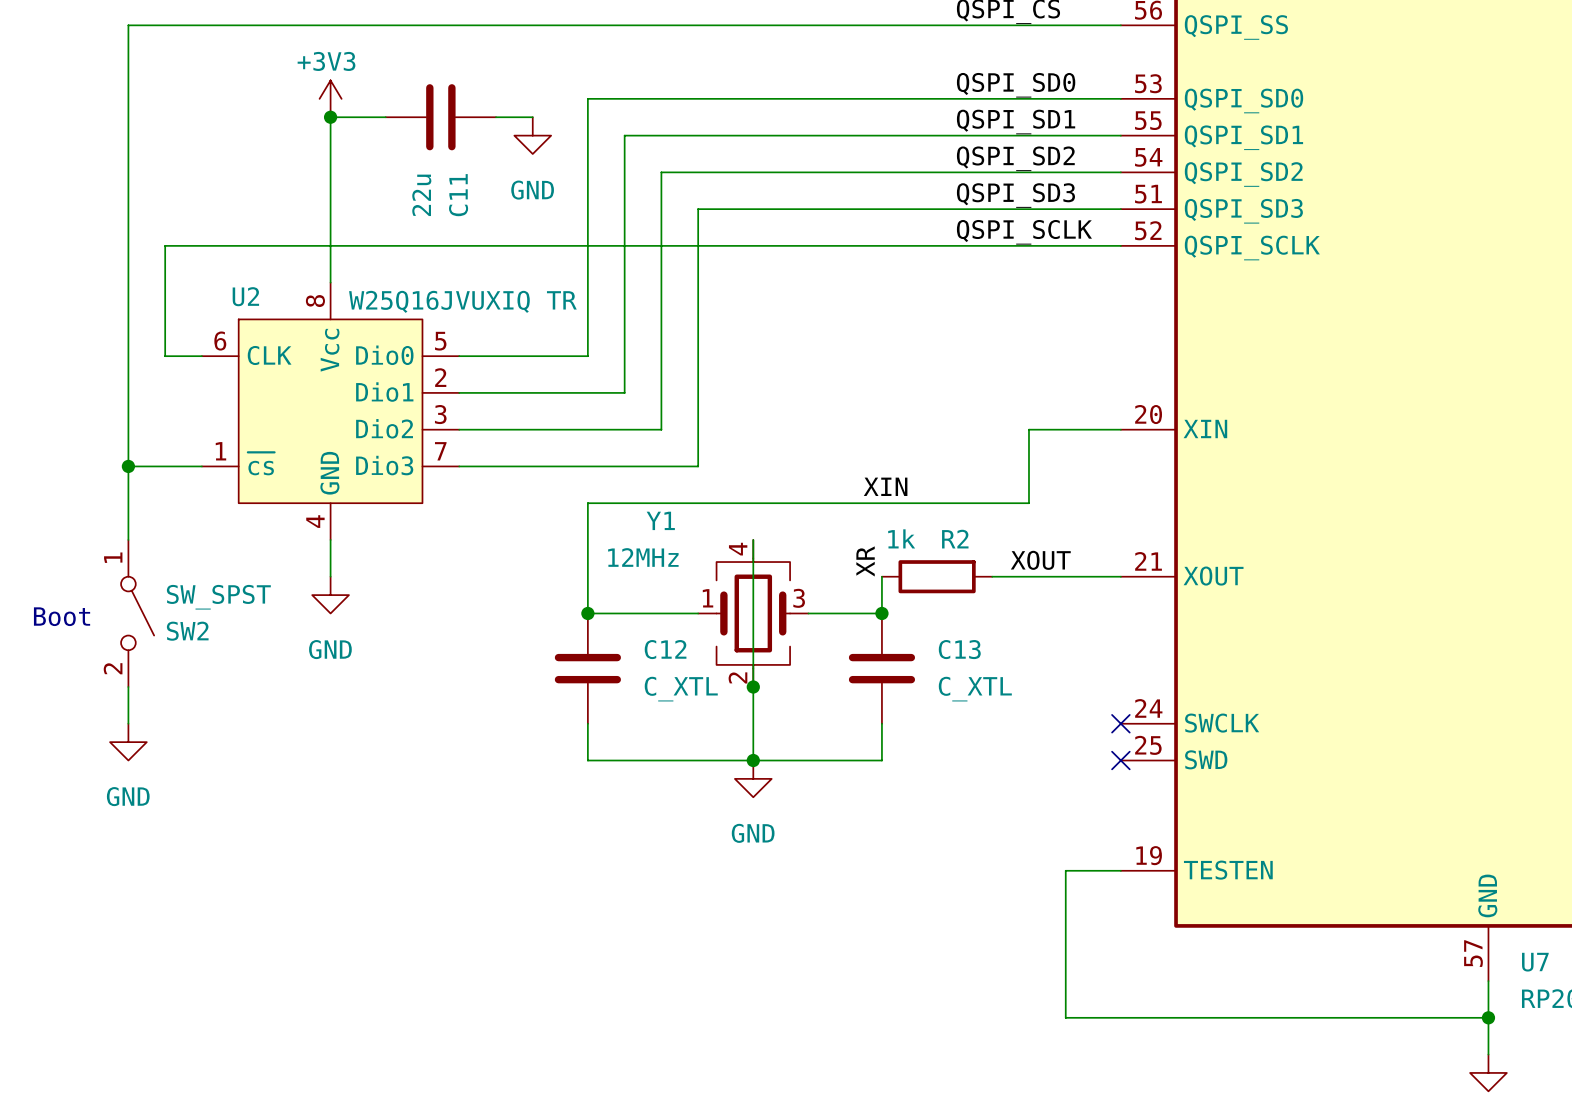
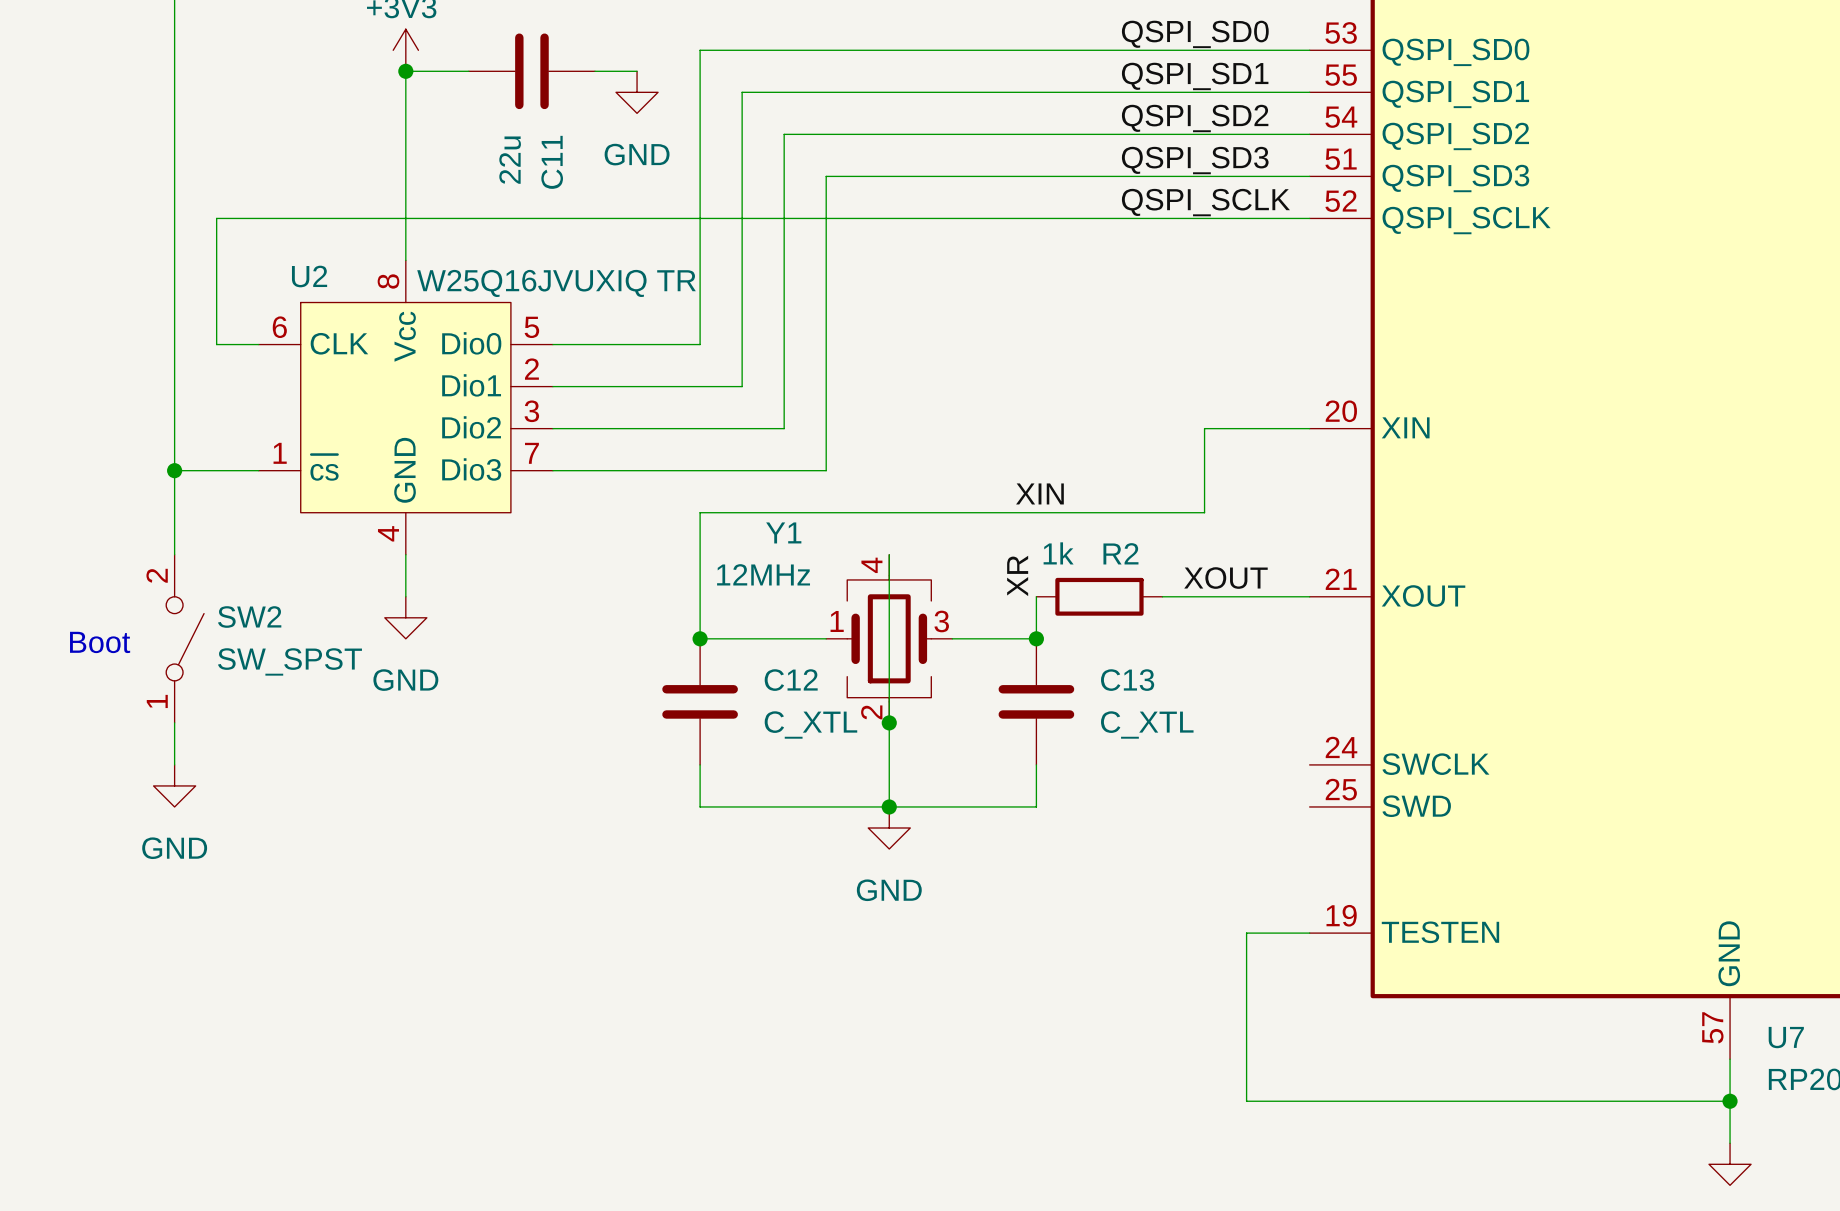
SW2 flip: as is (137, 613) -> up-down (185, 638)
no-connect mark: (1120, 723) -> none
no-connect mark: (1120, 760) -> none

